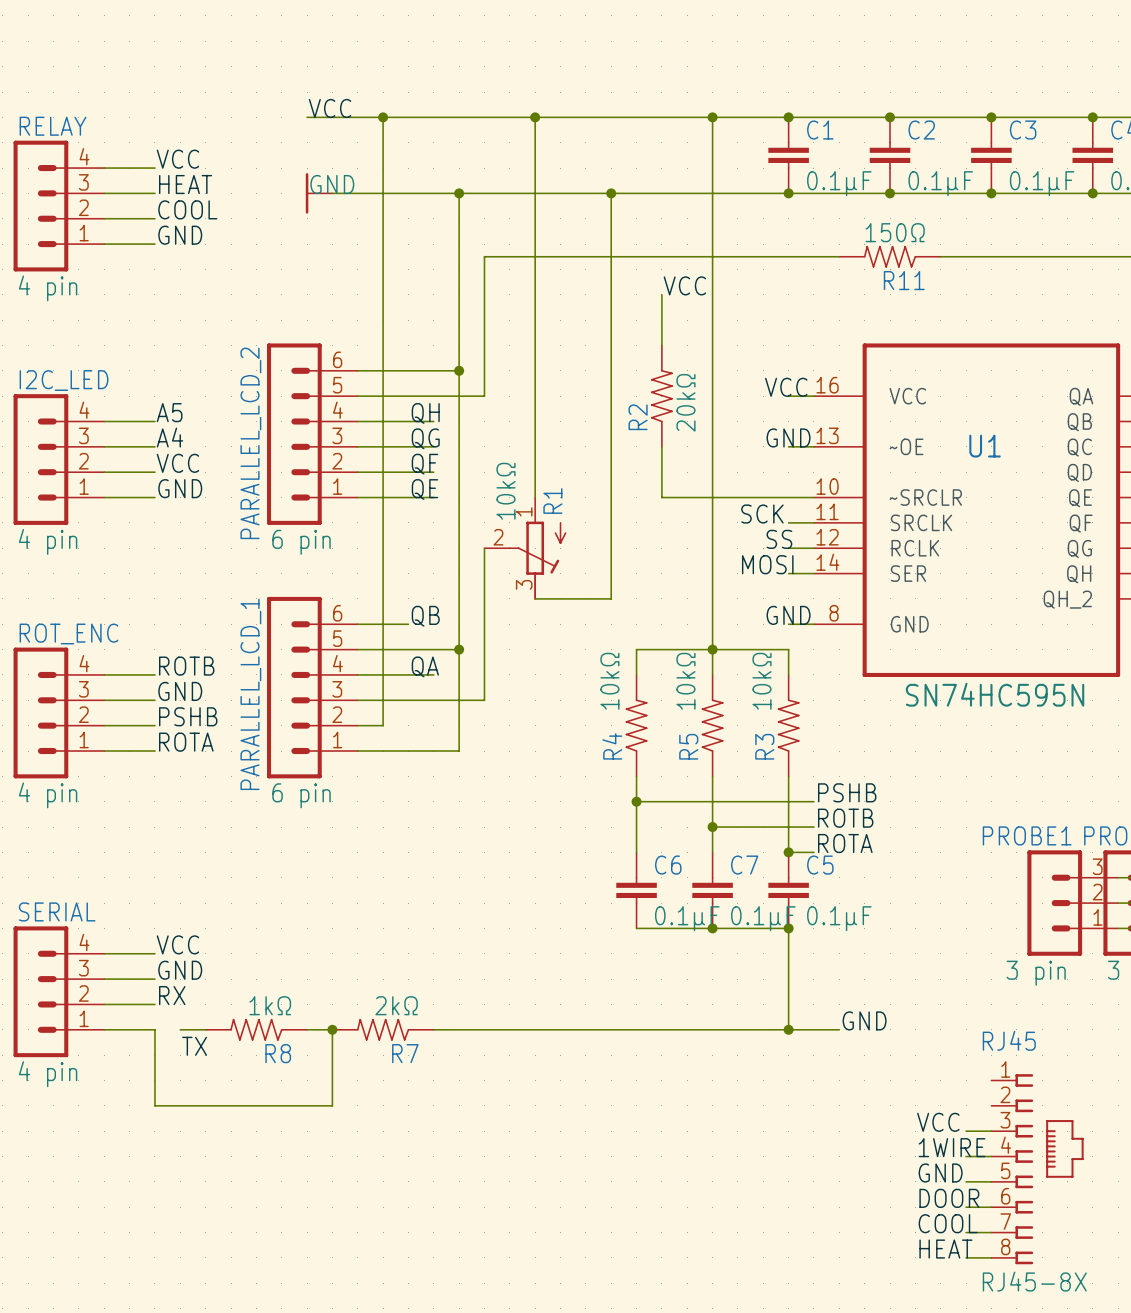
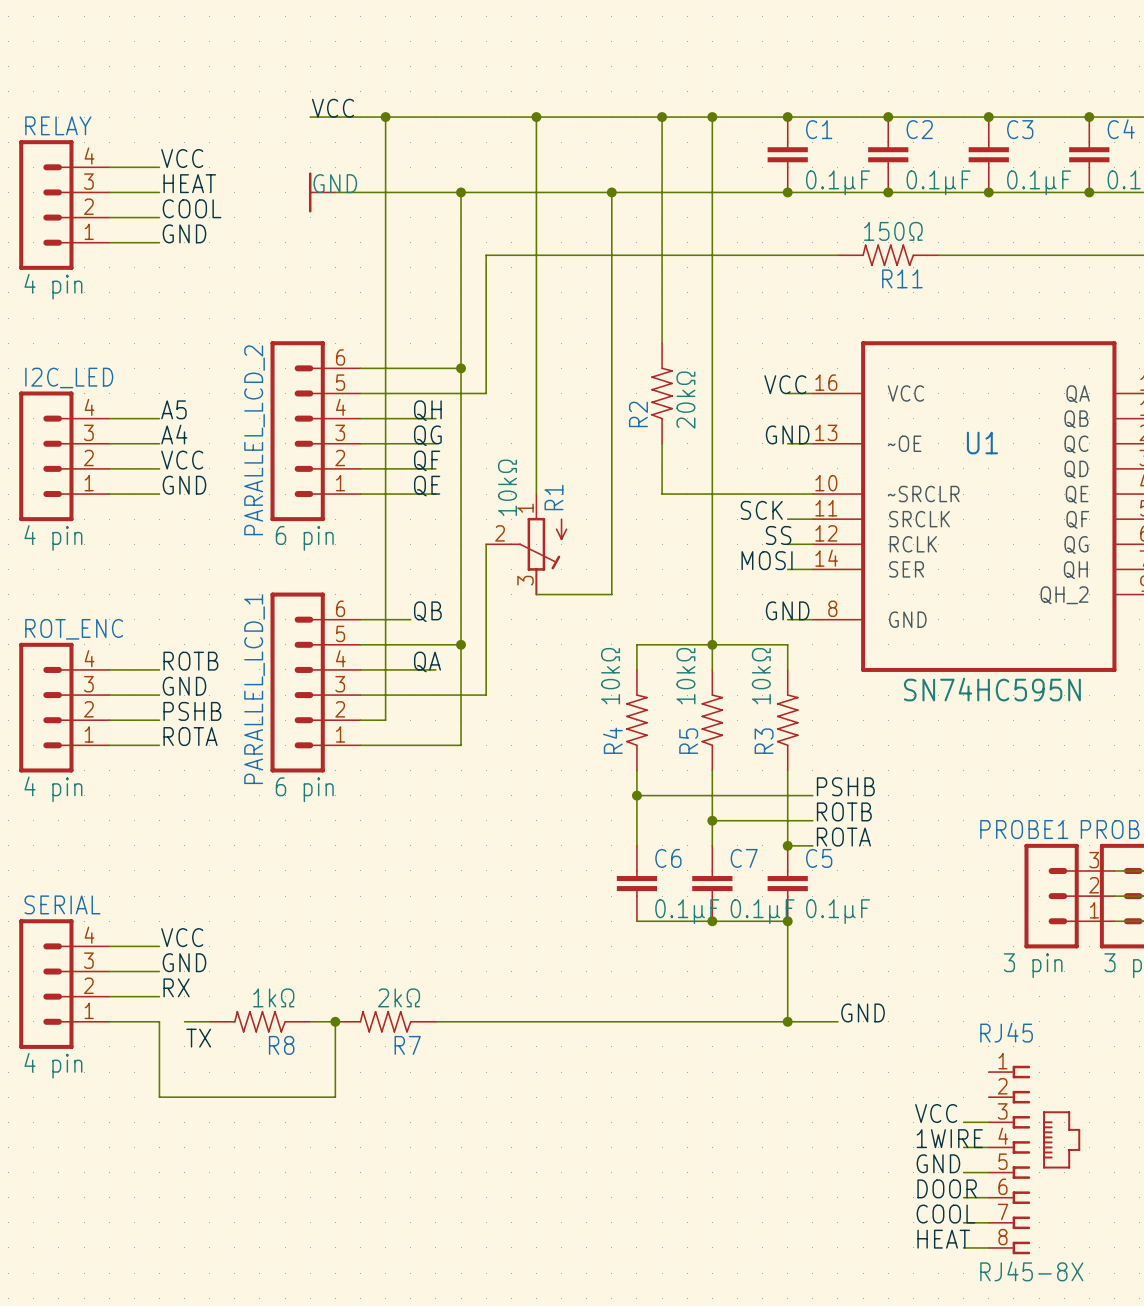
wire: none -> (662, 117) (662, 292)
junction: none -> (662, 117)
label: VCC (684, 285) -> none

